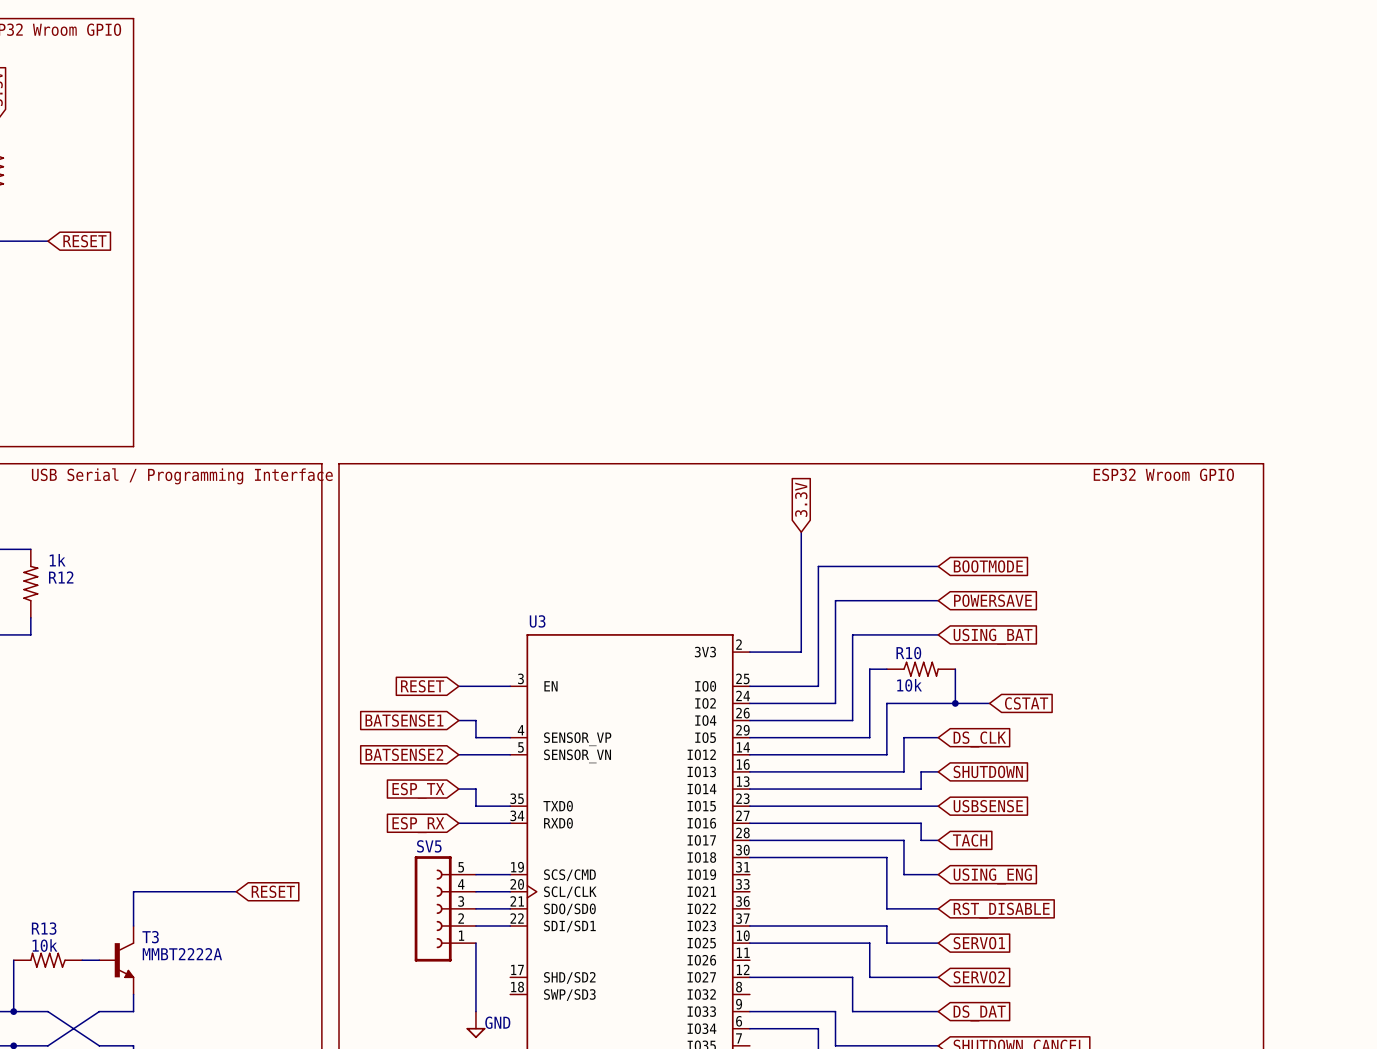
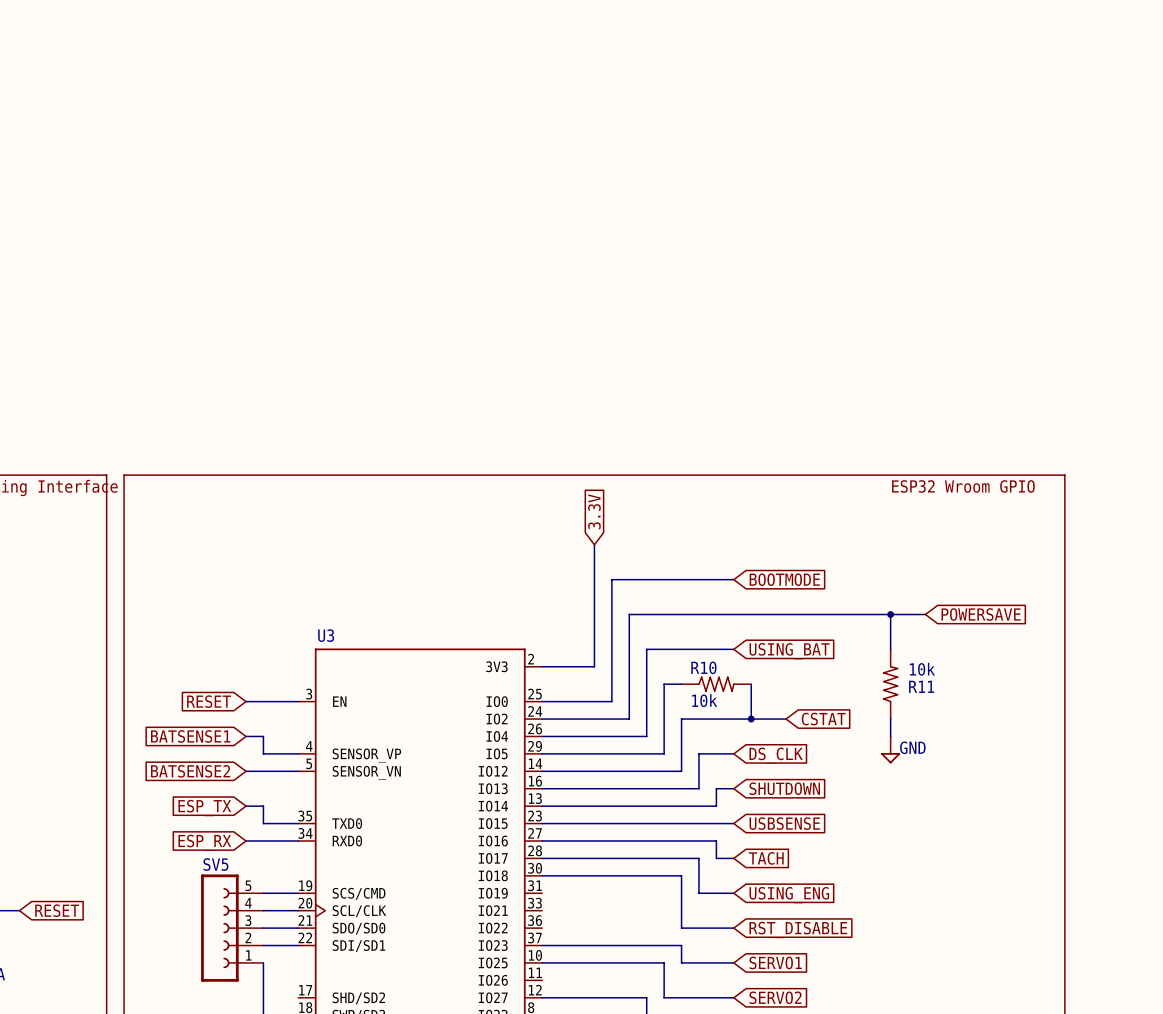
wire: none -> (733, 614) (925, 614)
global label: POWERSAVE (992, 600) -> none
wire: none -> (890, 614) (890, 649)
junction: none -> (890, 614)
global label: none -> POWERSAVE (981, 614)
R11: none -> 10k (890, 684)
wire: none -> (890, 719) (890, 736)
power symbol: none -> GND (890, 749)

